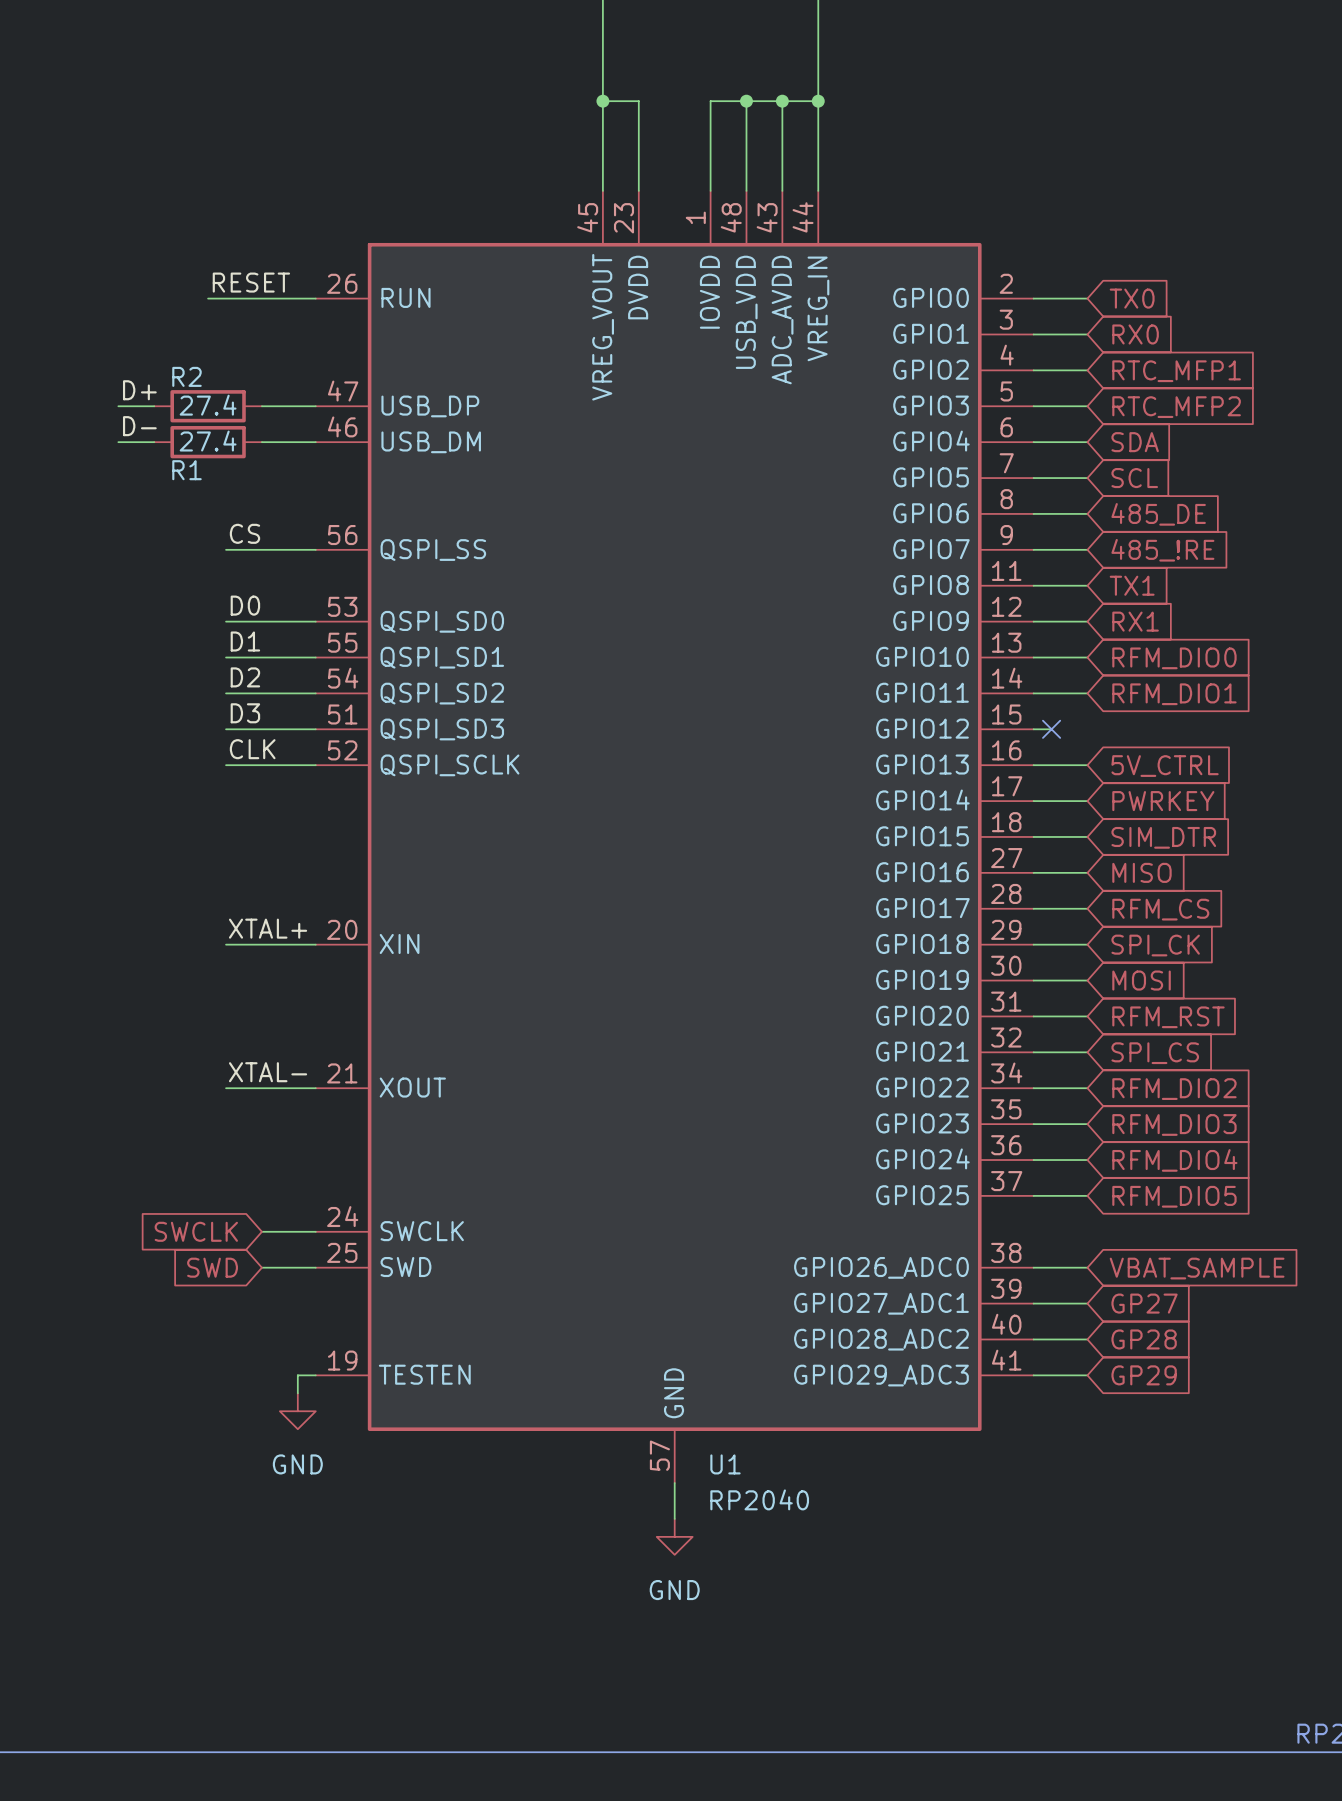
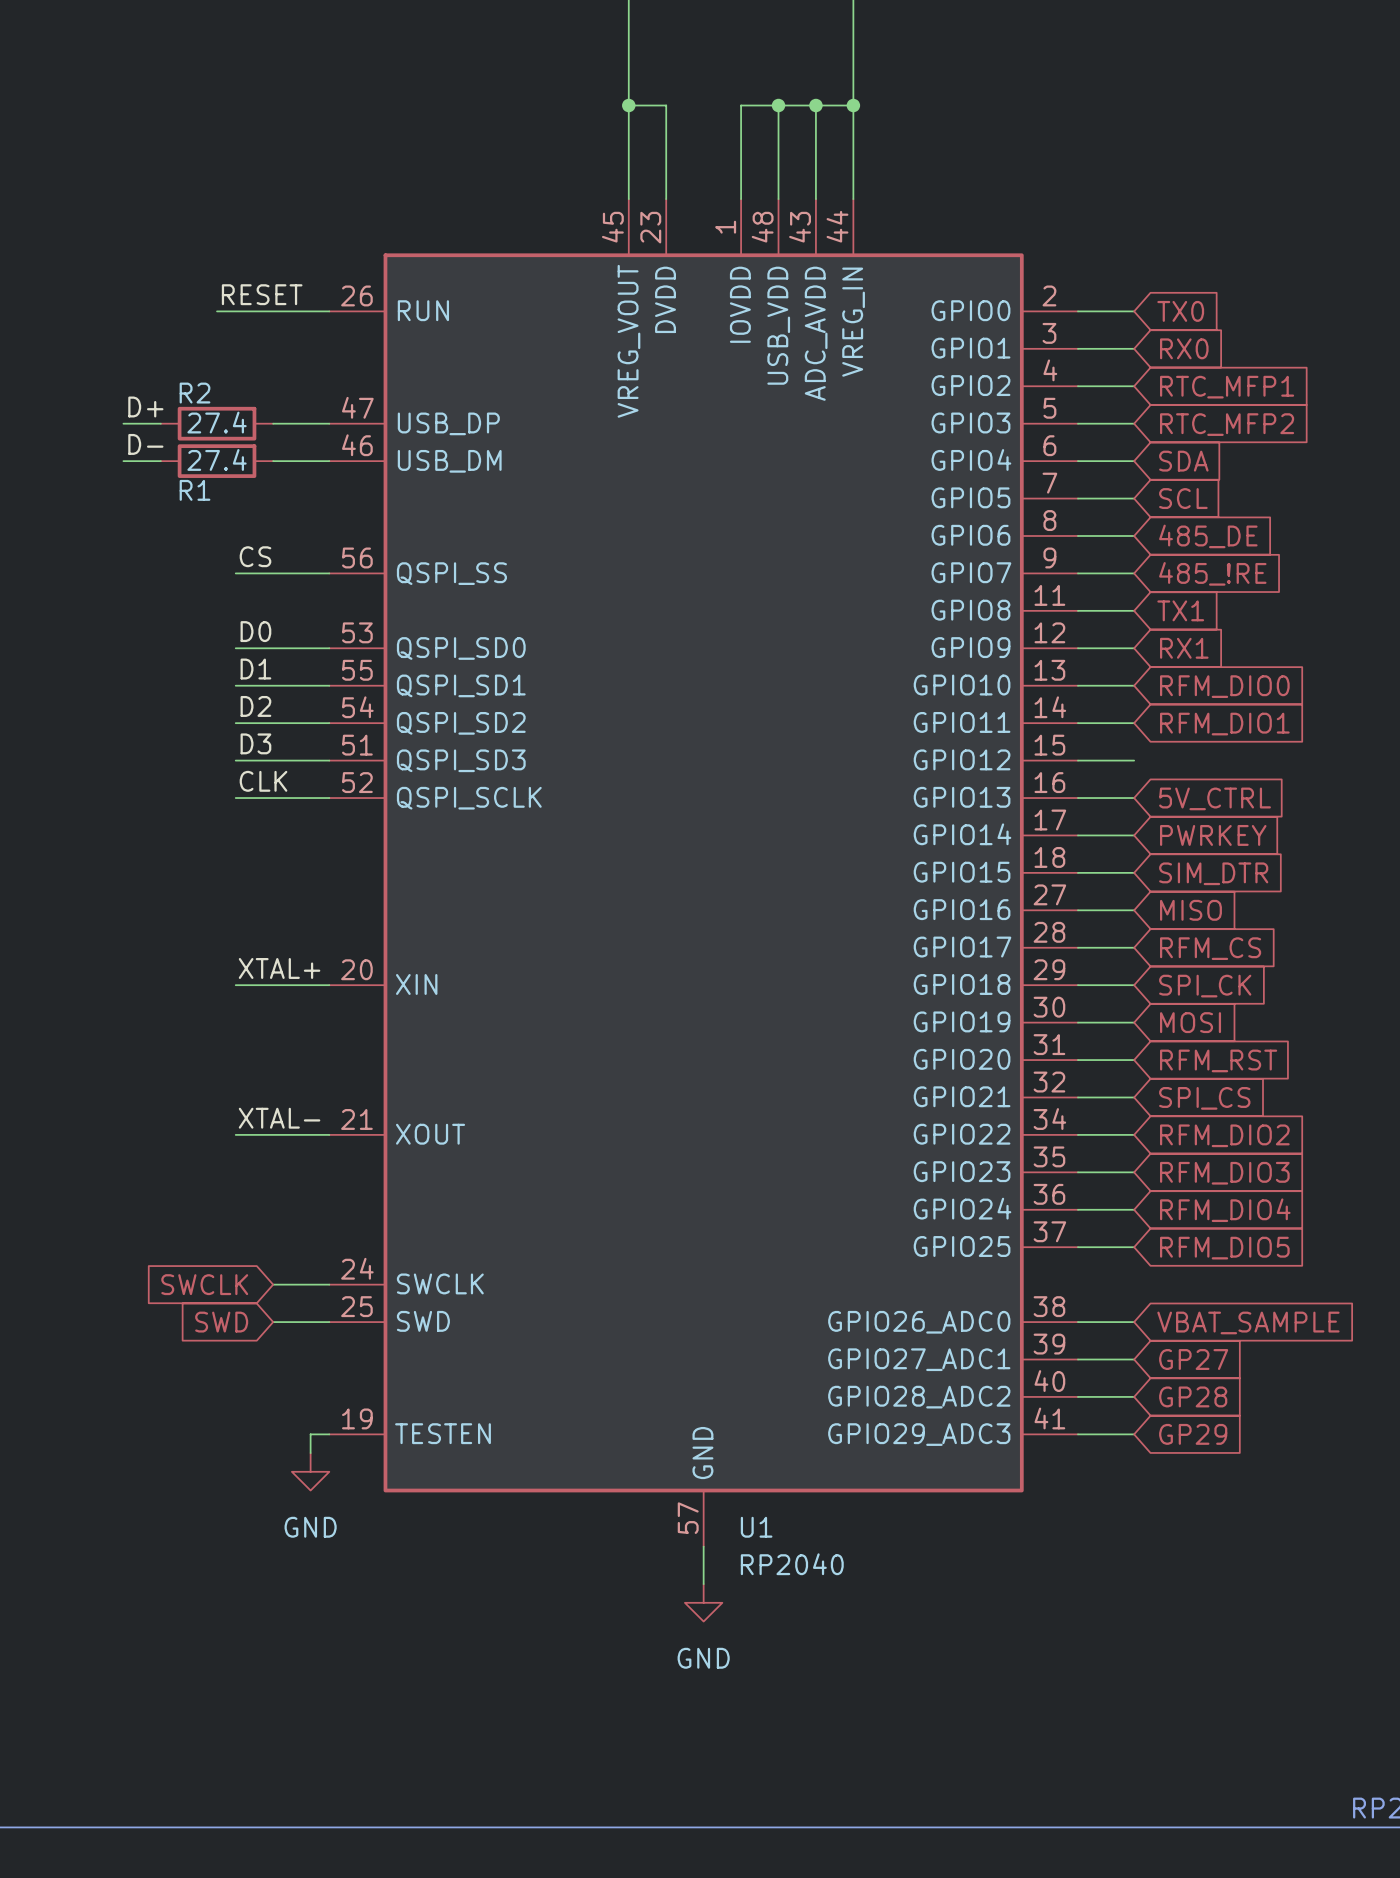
wire: none -> (1096, 760) (1134, 760)
no-connect mark: (1051, 729) -> none

